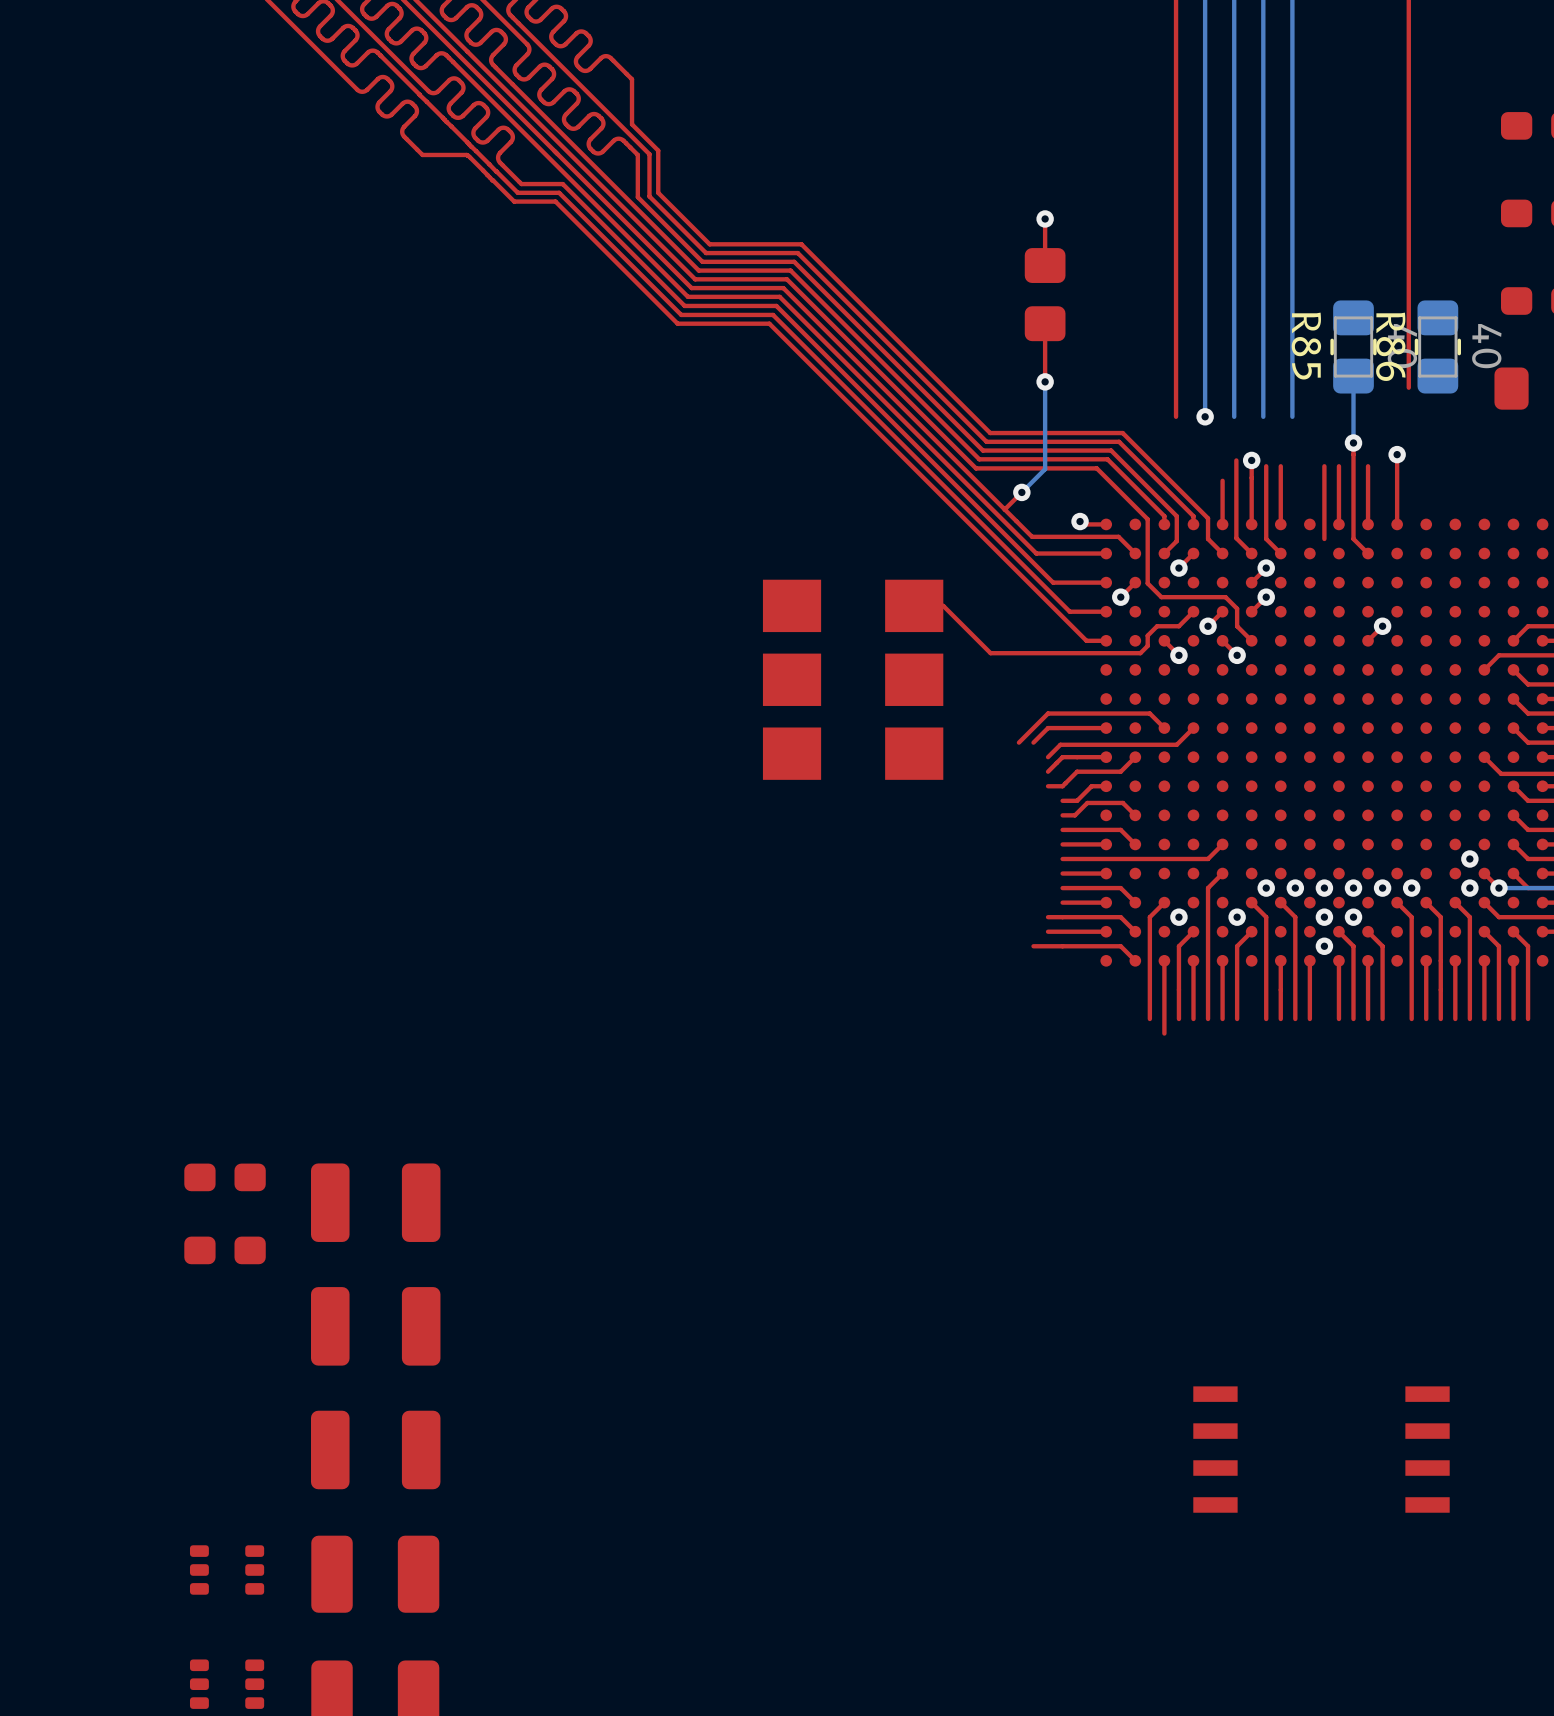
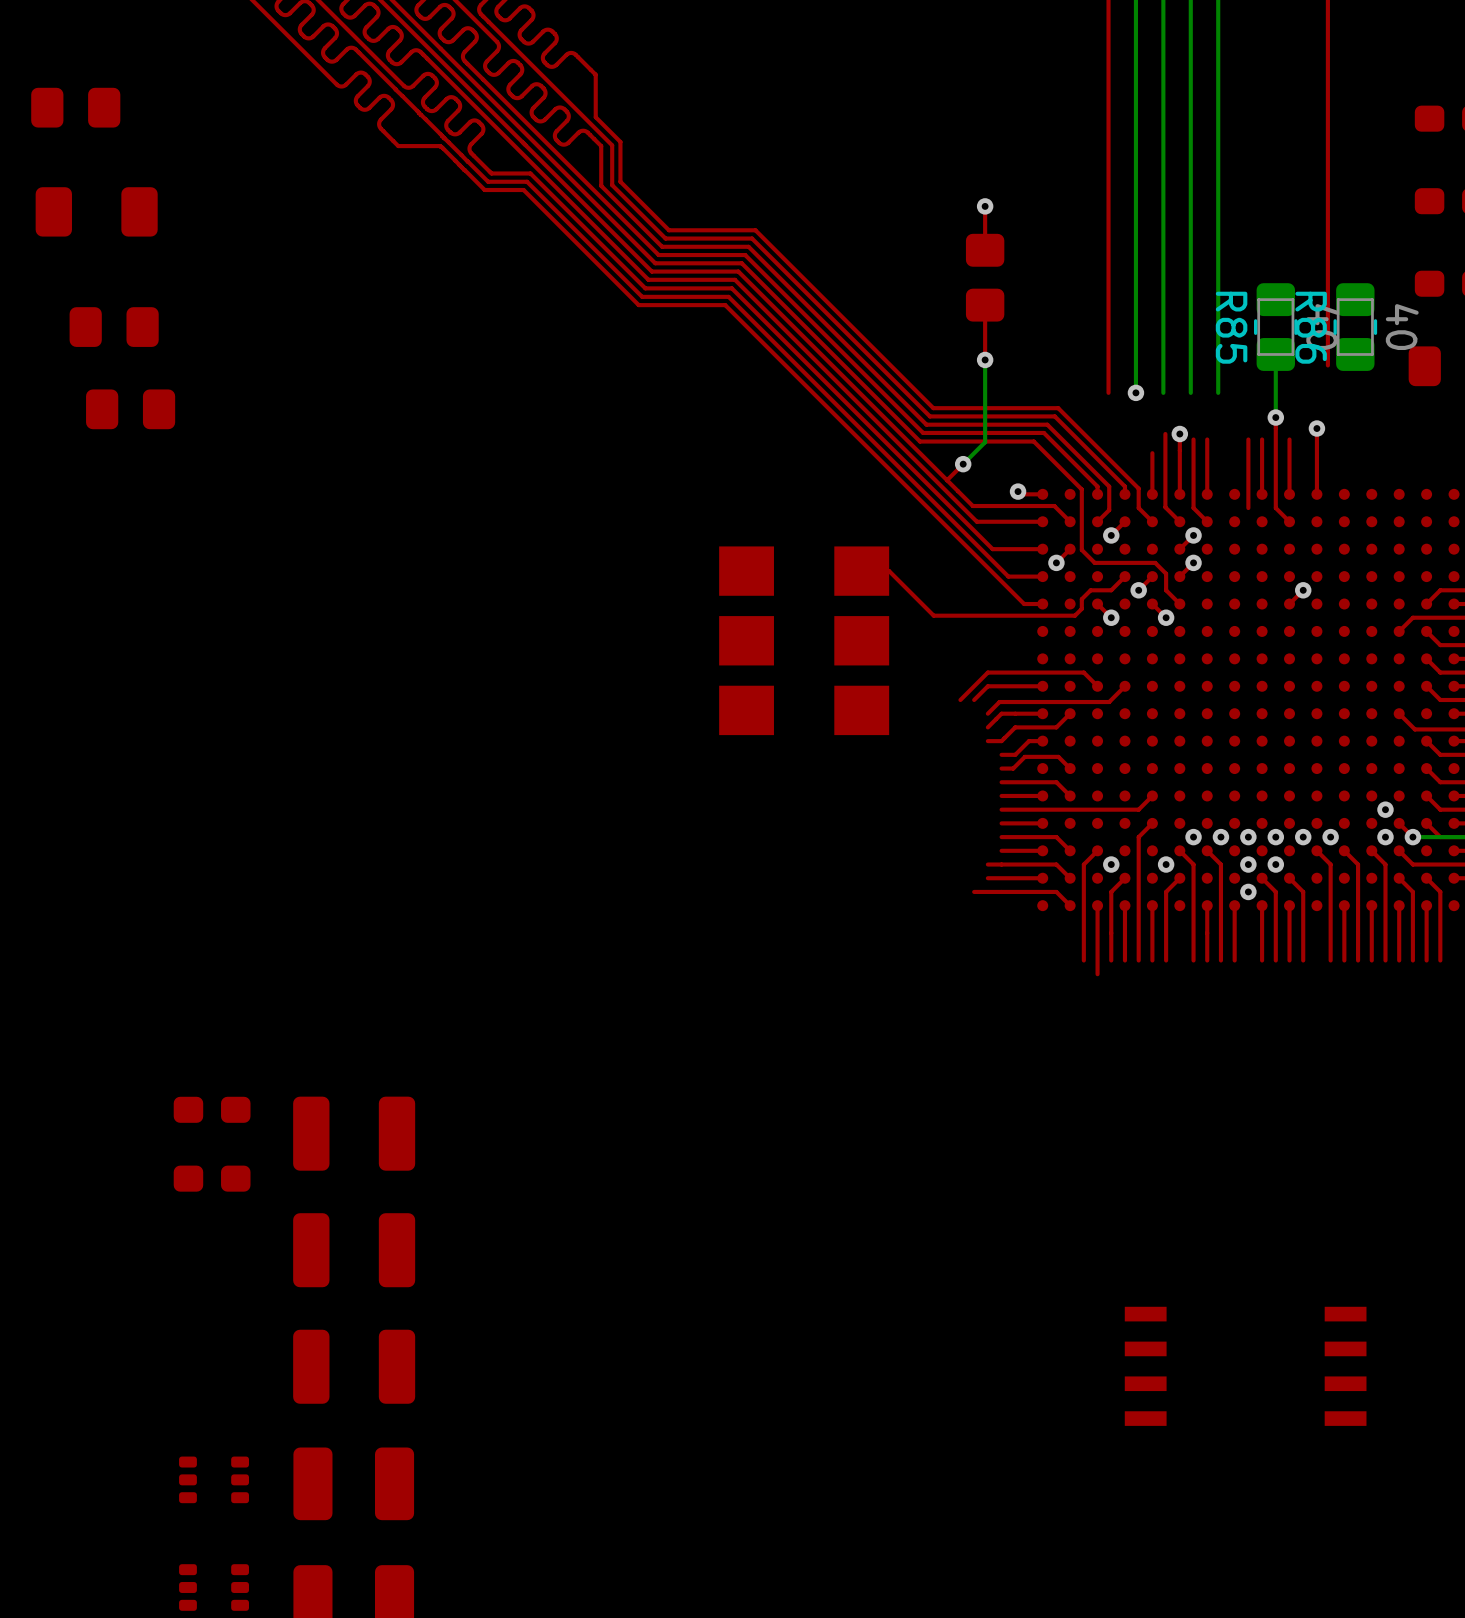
part: none -> (75, 107)
part: none -> (96, 211)
part: none -> (114, 327)
part: none -> (130, 409)

